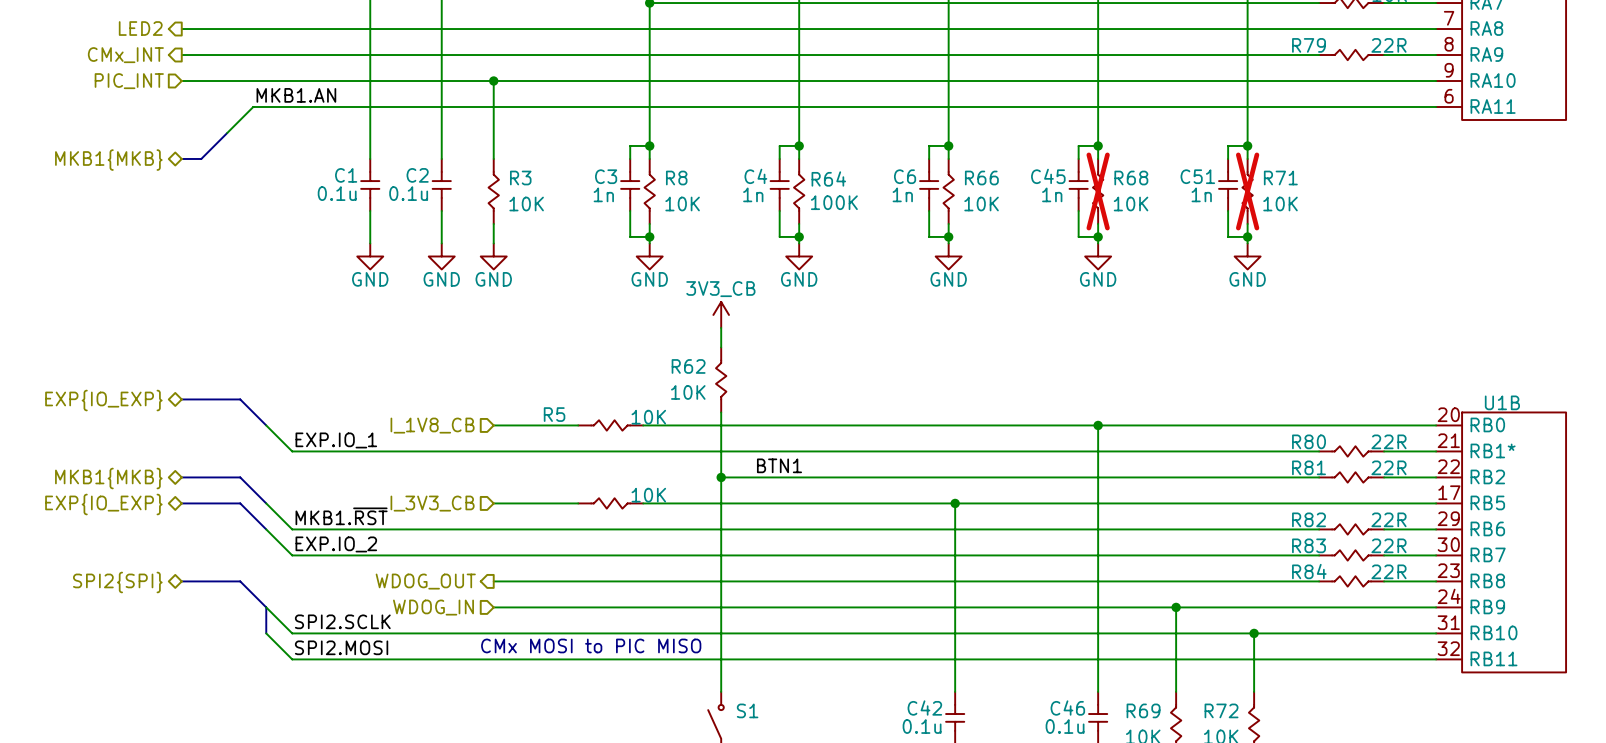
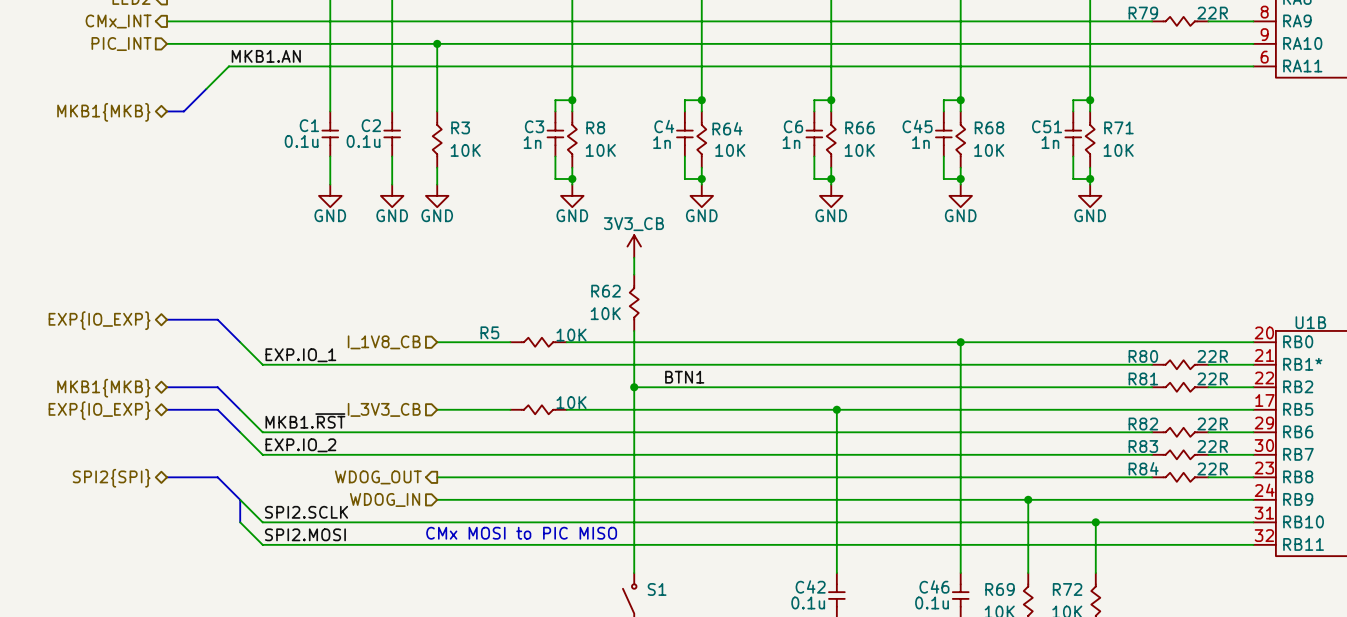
R68 do-not-place cross: (1098, 191) -> none
R71 do-not-place cross: (1247, 191) -> none
R64 value: 100K (834, 202) -> 10K (730, 150)

